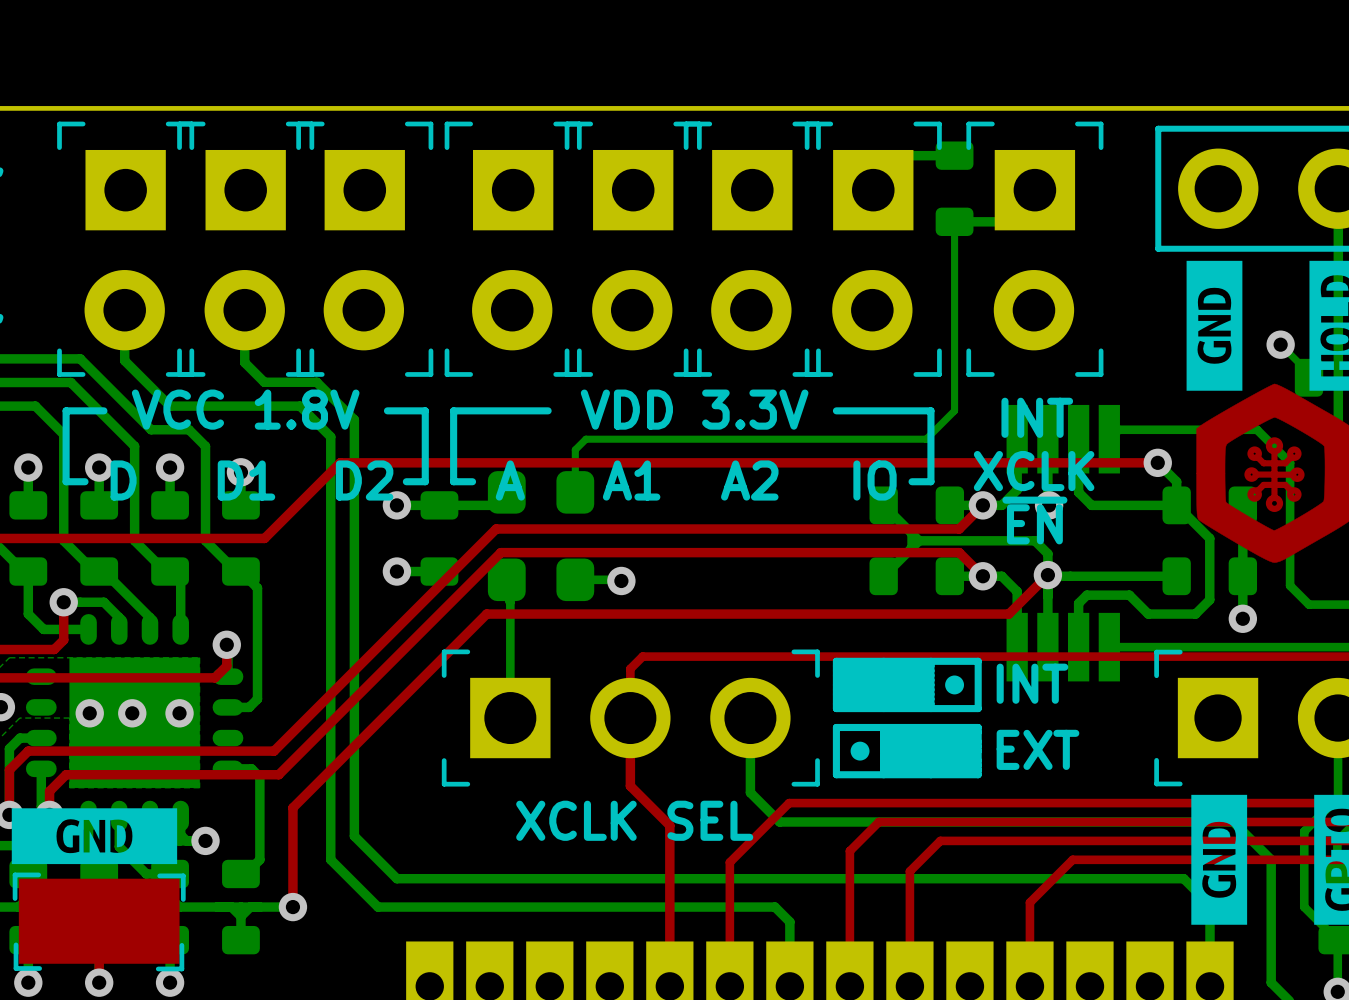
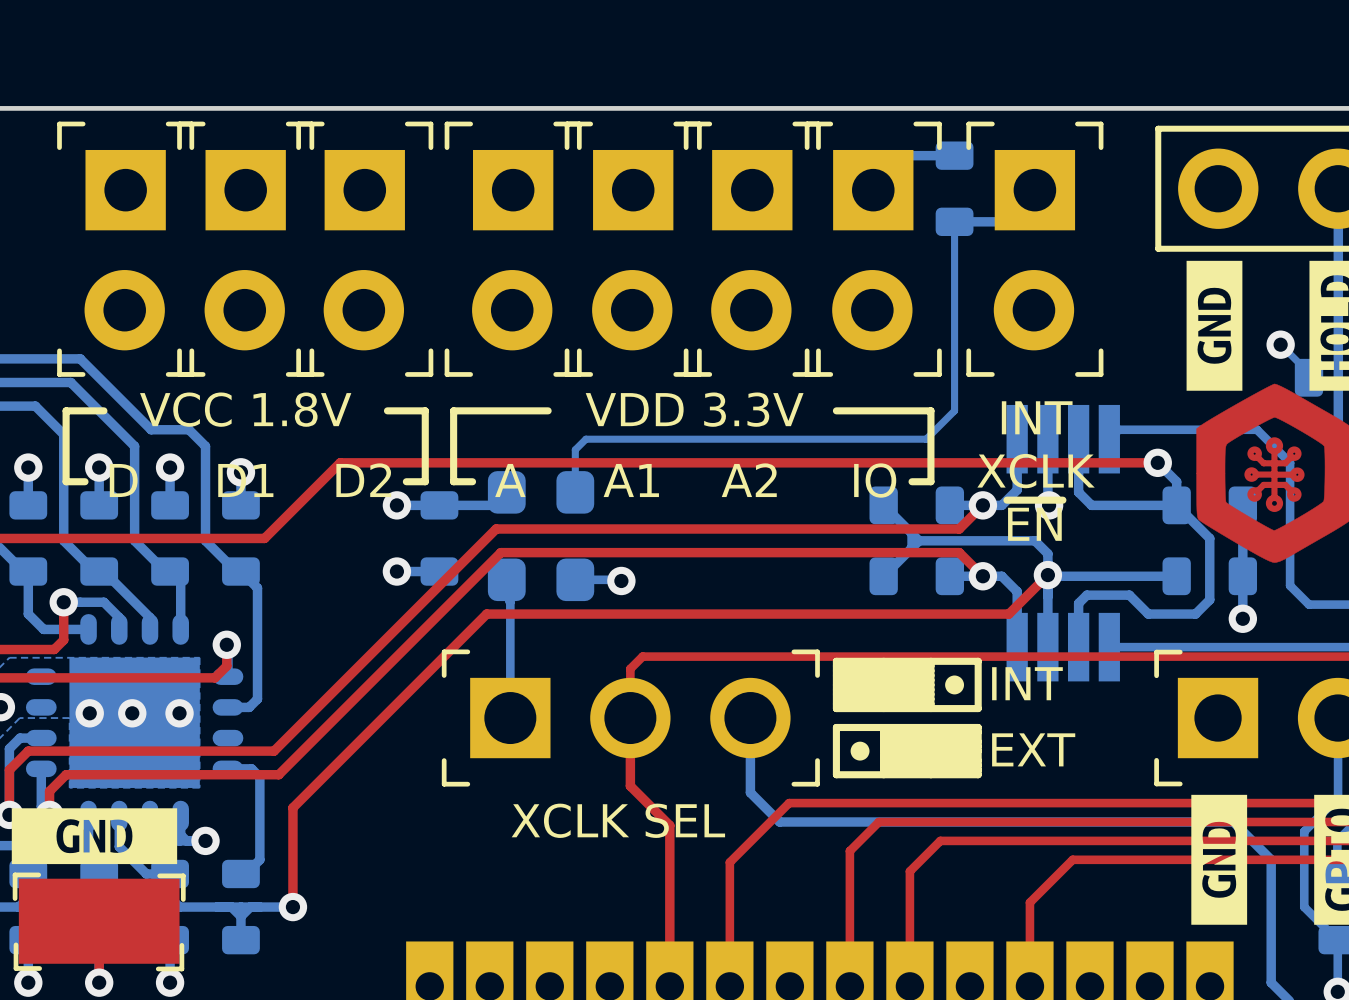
bottom track: (124, 310) (124, 360) (170, 406) (300, 406) (330, 436) (330, 859) (378, 907) (774, 907) (789, 921) (789, 986) -> none
bottom track: (244, 310) (244, 362) (264, 382) (316, 382) (354, 419) (354, 836) (396, 878) (1183, 878) (1209, 904) (1209, 986) -> none

